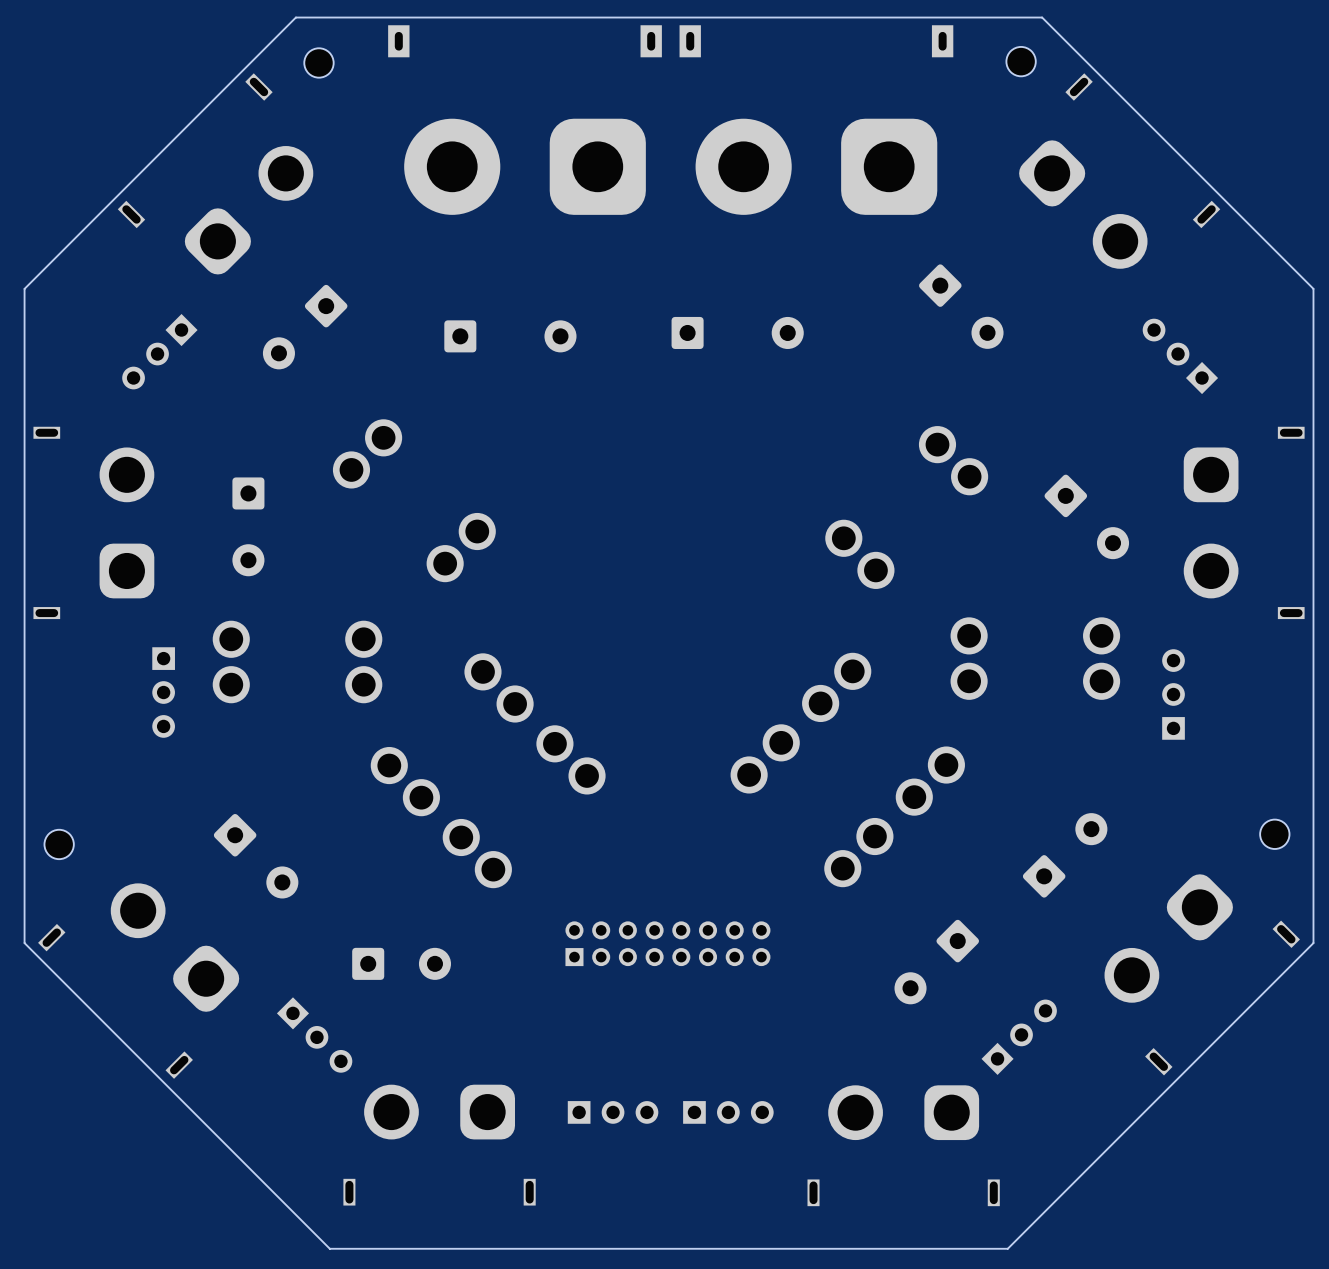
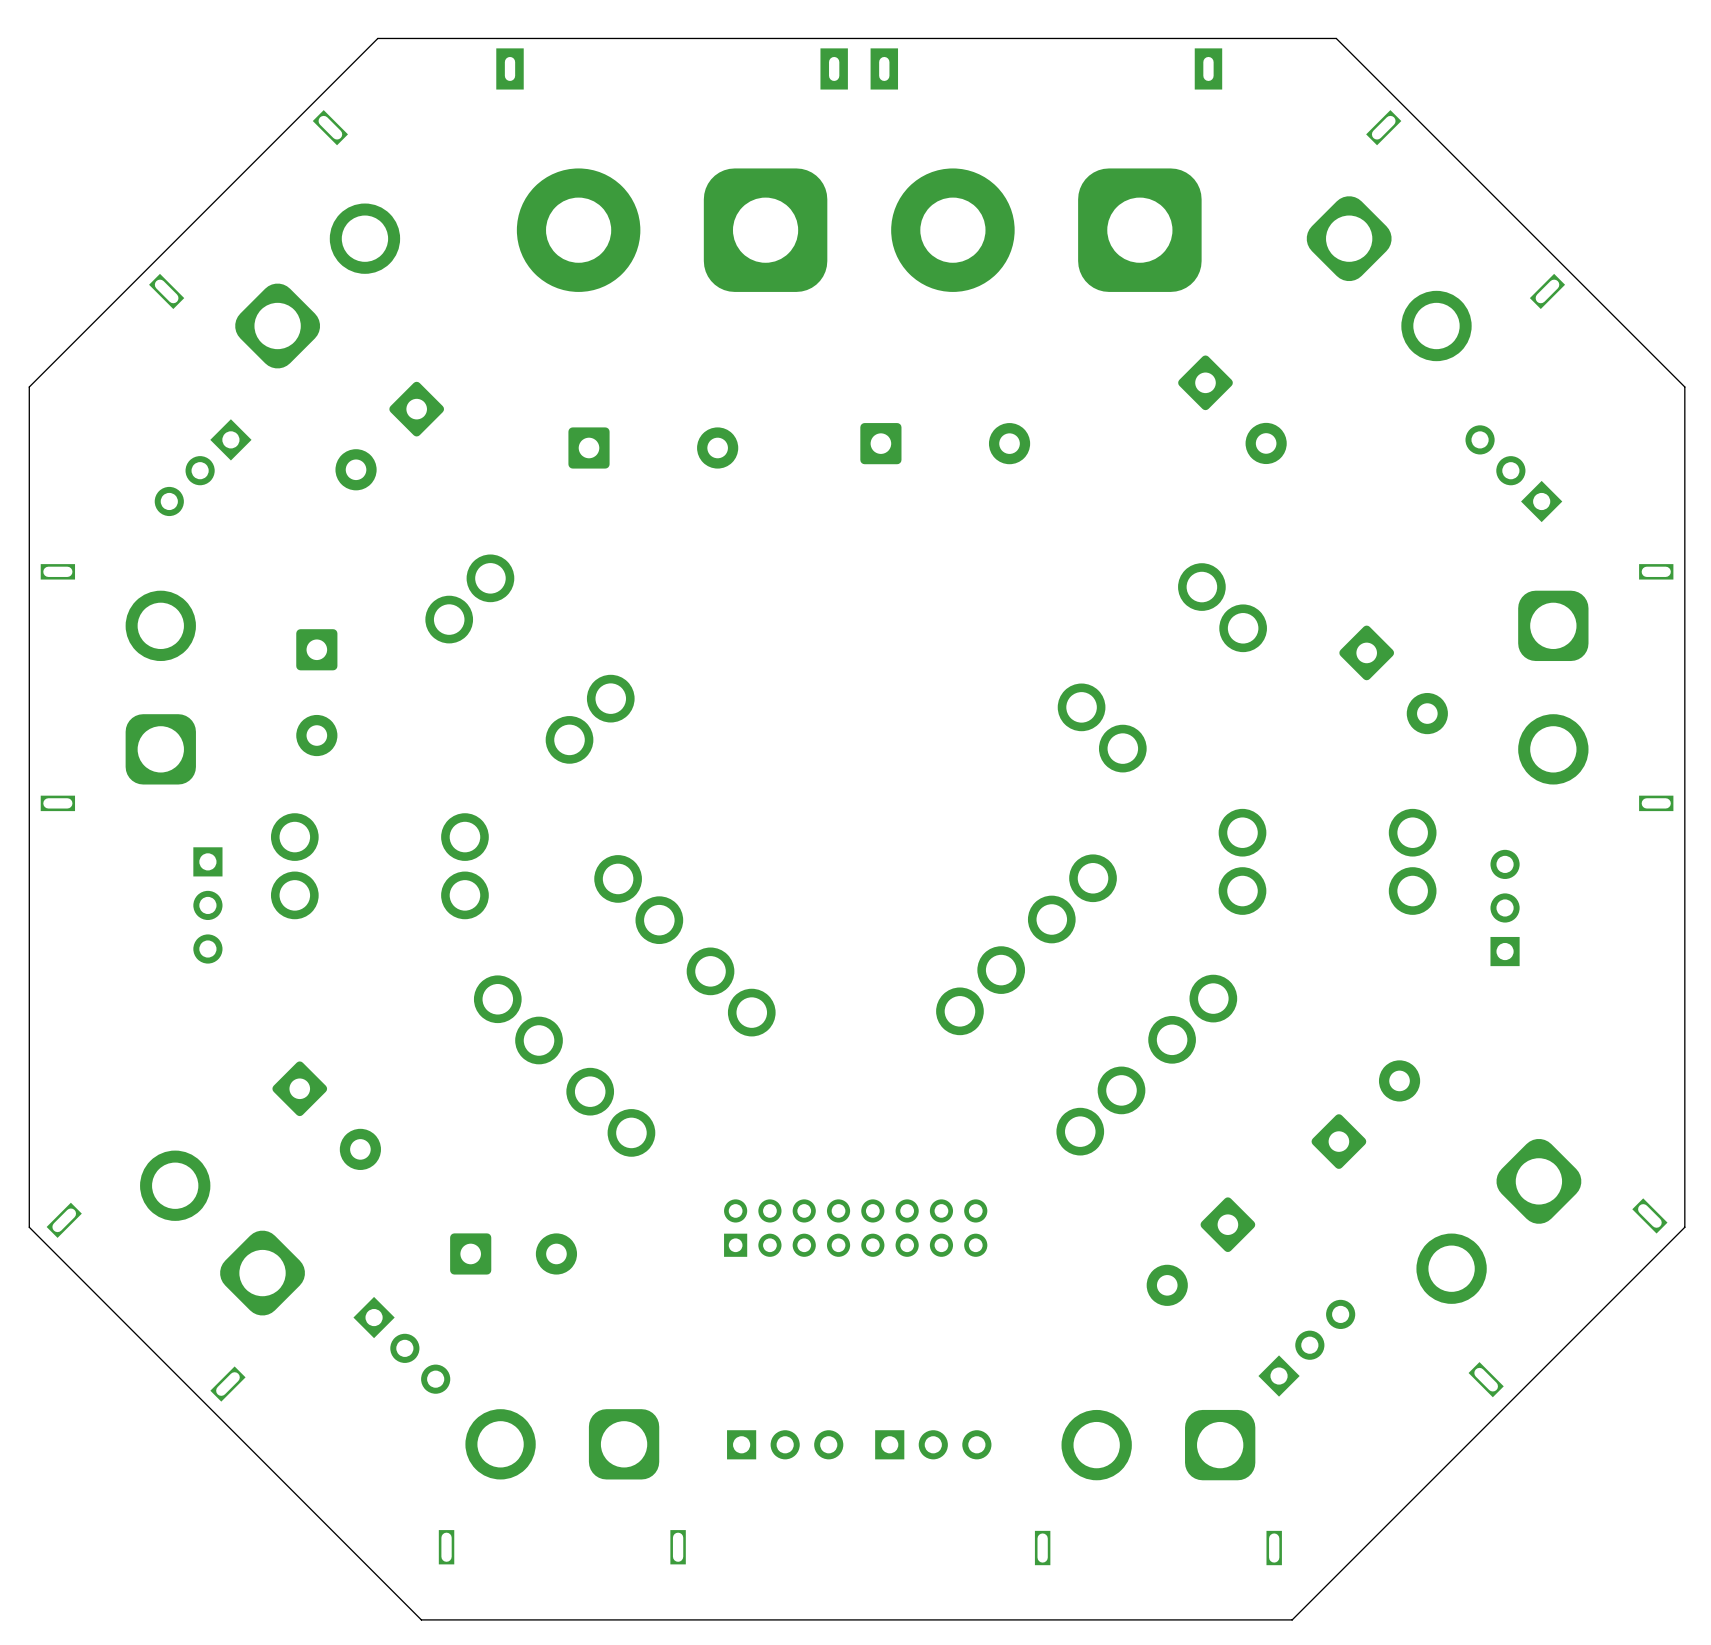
part: (1021, 61) -> none
part: (318, 62) -> none
part: (1274, 834) -> none
part: (59, 844) -> none

